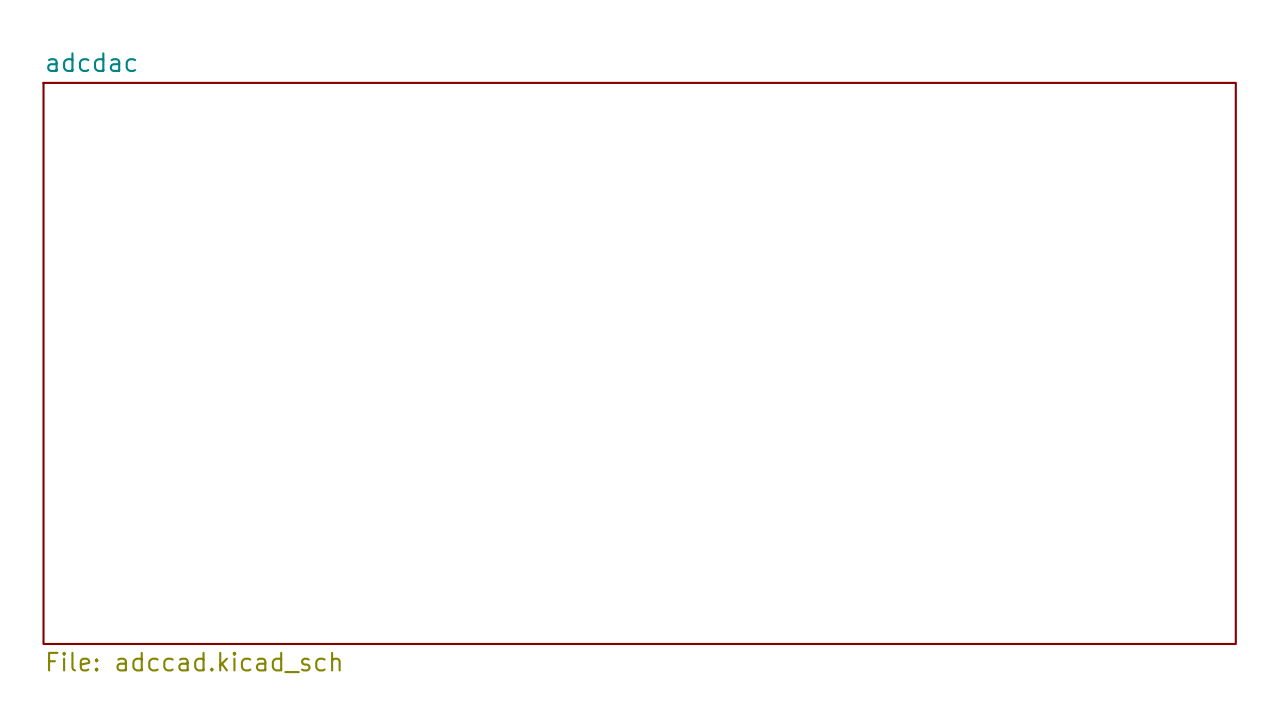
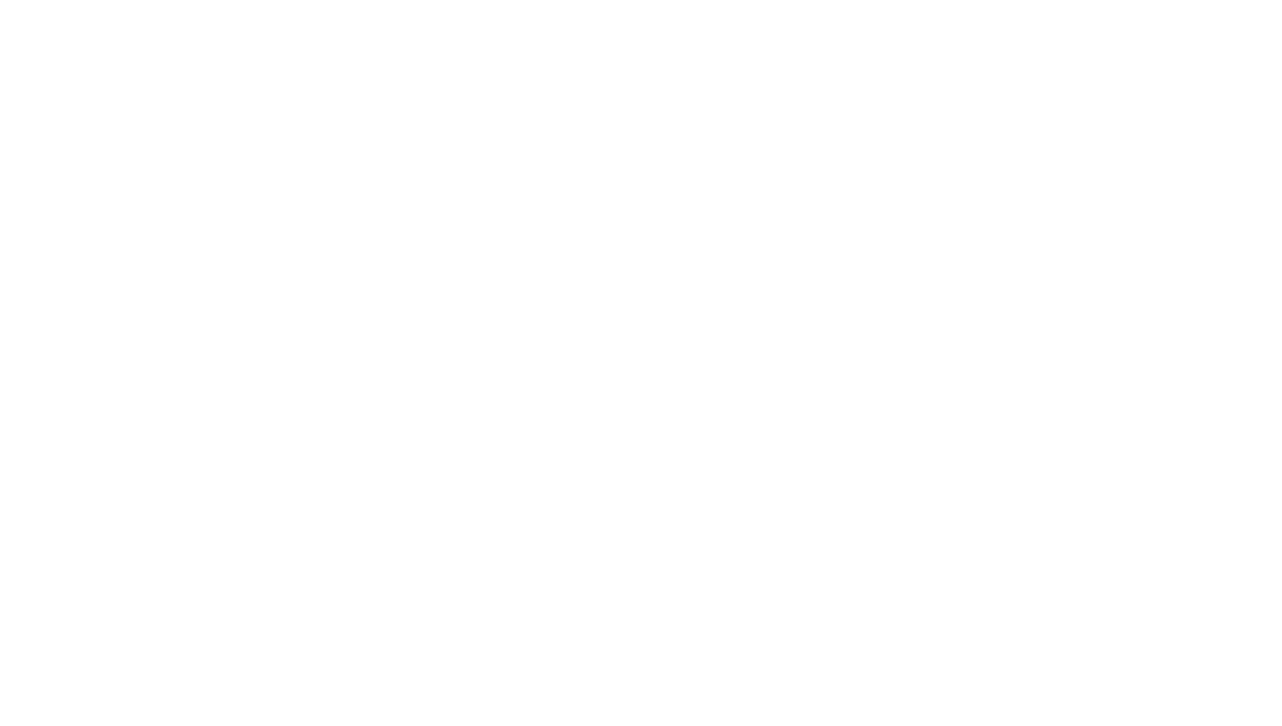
sheet adcdac: File: adccad.kicad_sch (639, 363) -> none

